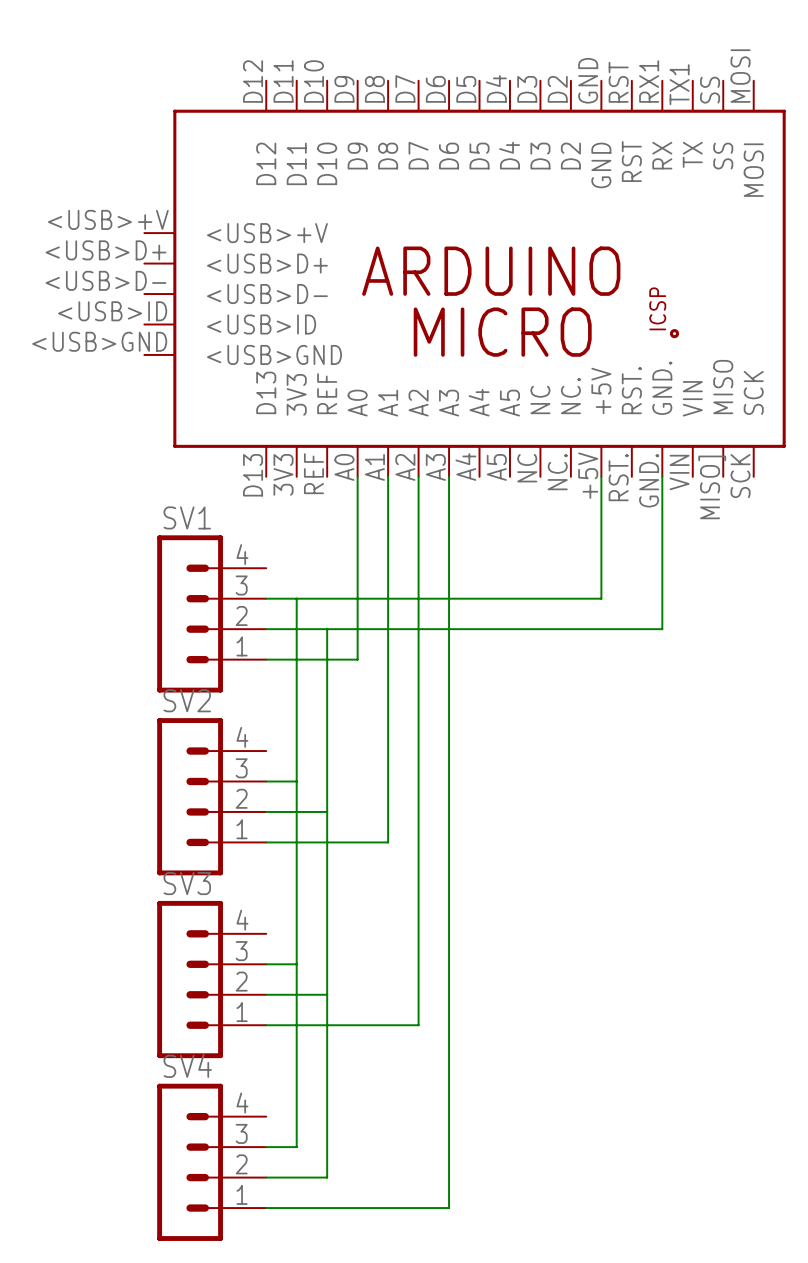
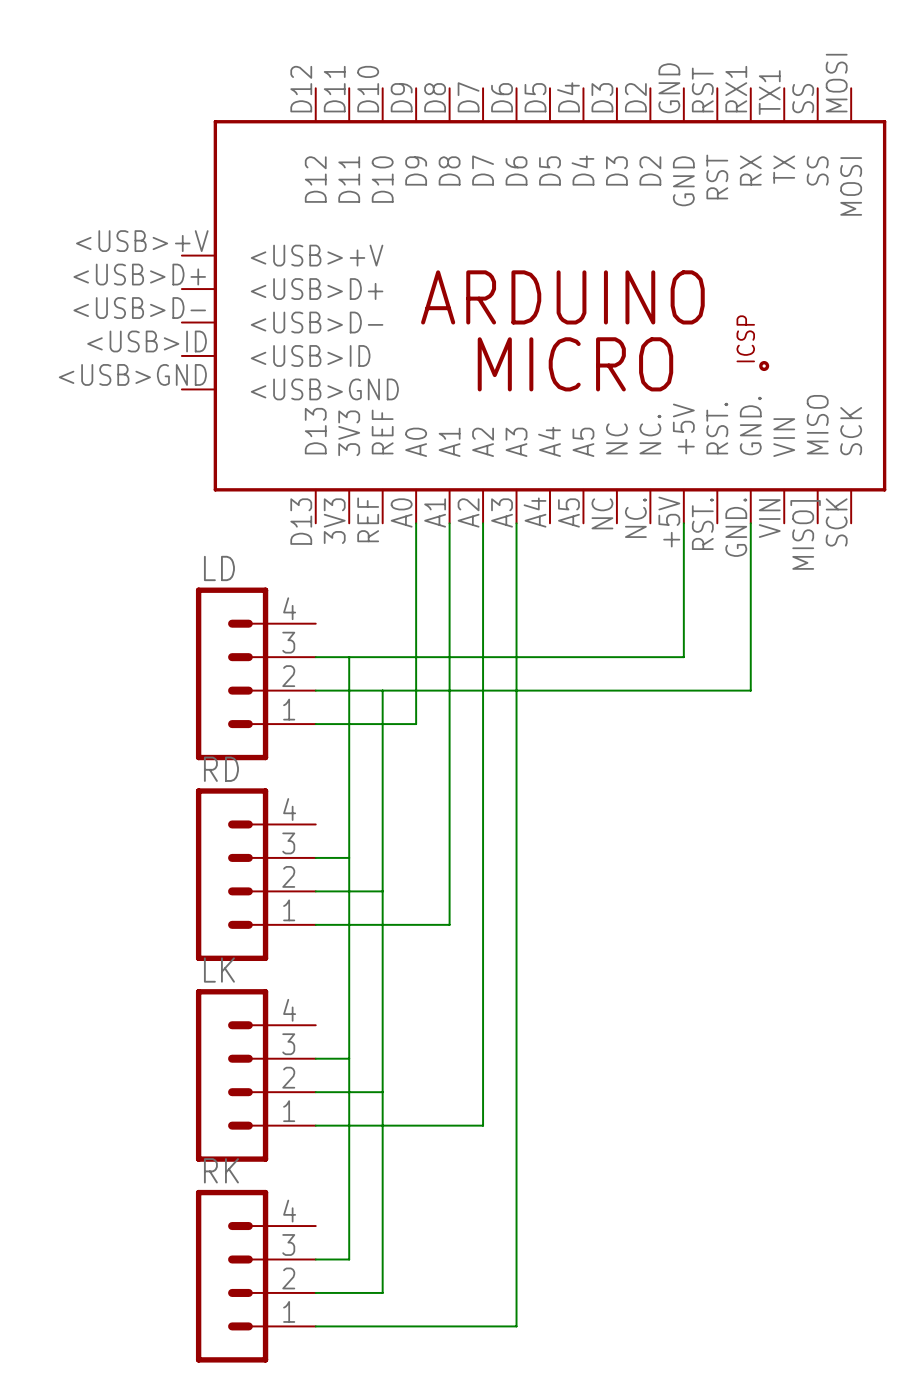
SV1 name: SV1 (187, 517) -> LD (219, 568)
SV2 name: SV2 (187, 700) -> RD (221, 769)
SV3 name: SV3 (187, 883) -> LK (219, 970)
SV4 name: SV4 (187, 1065) -> RK (221, 1170)

